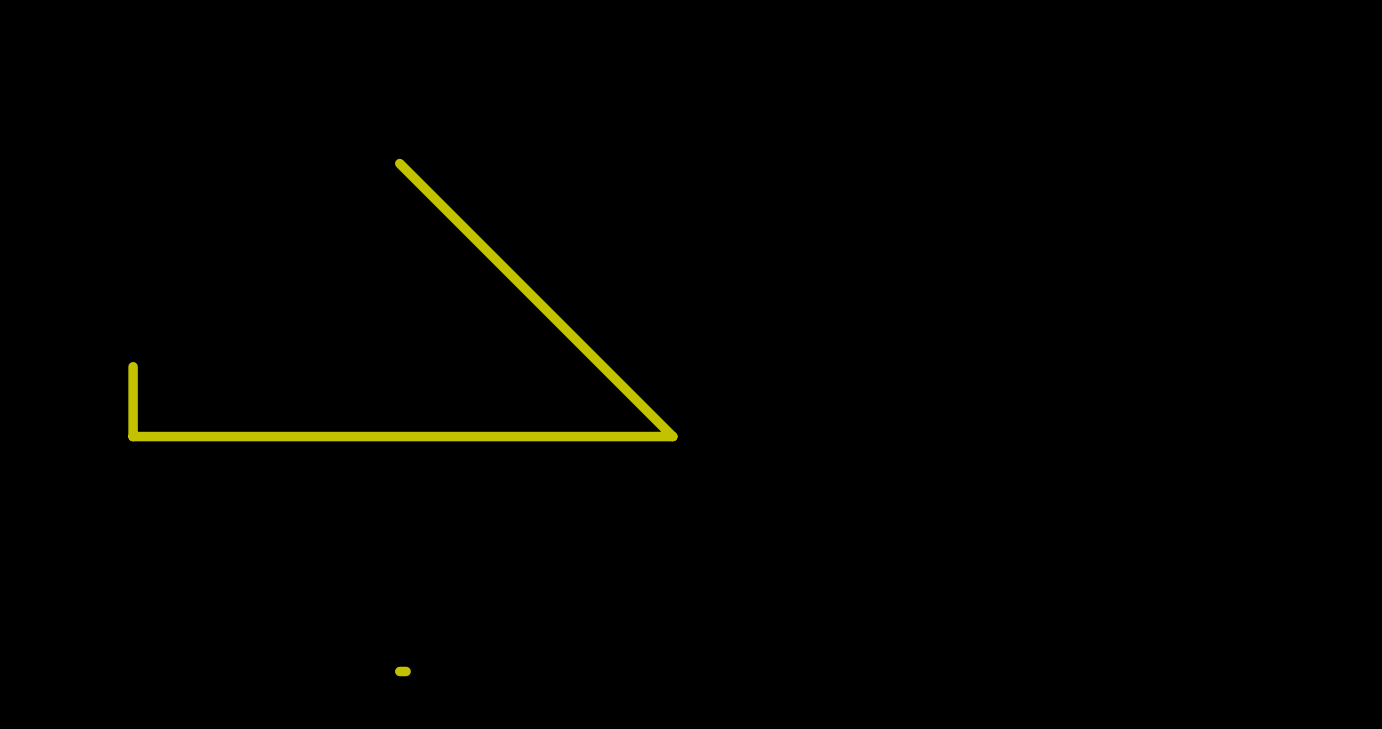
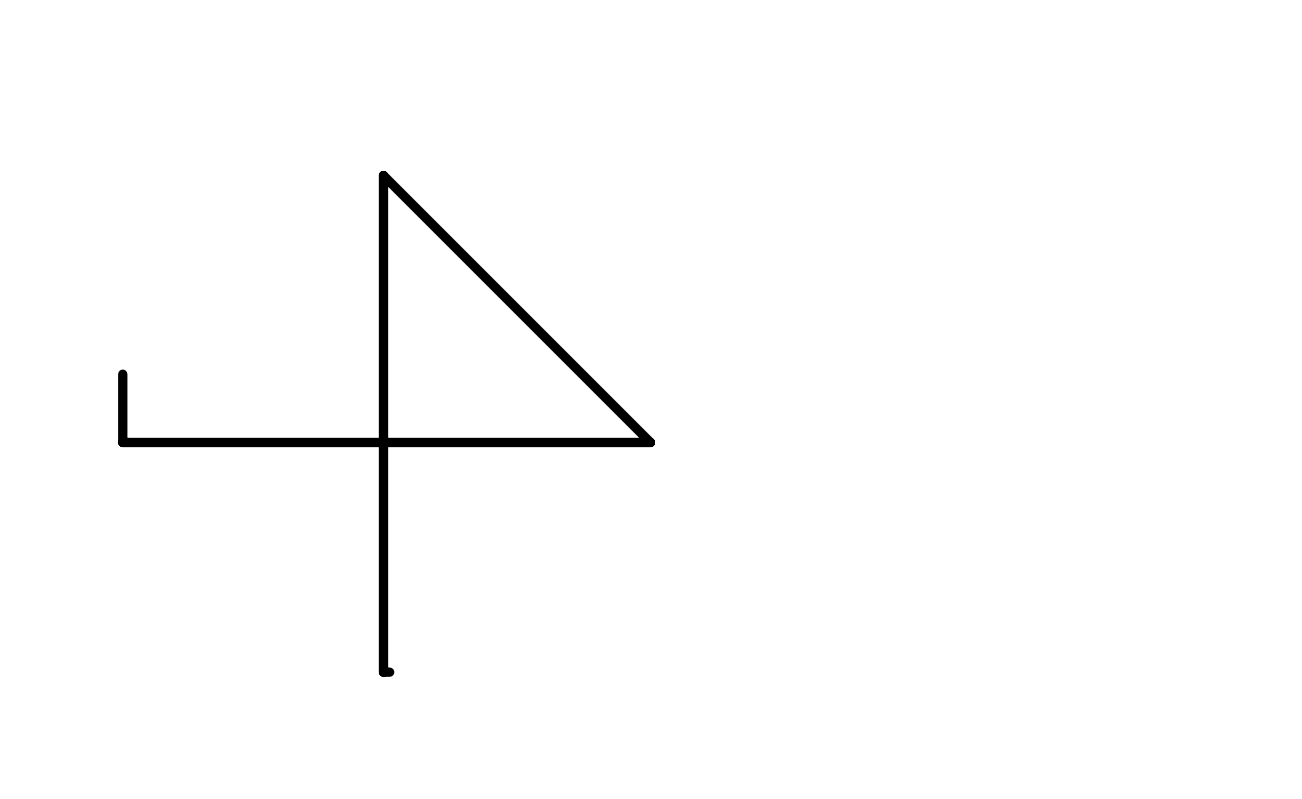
board edge: none -> (383, 175) (383, 672)

